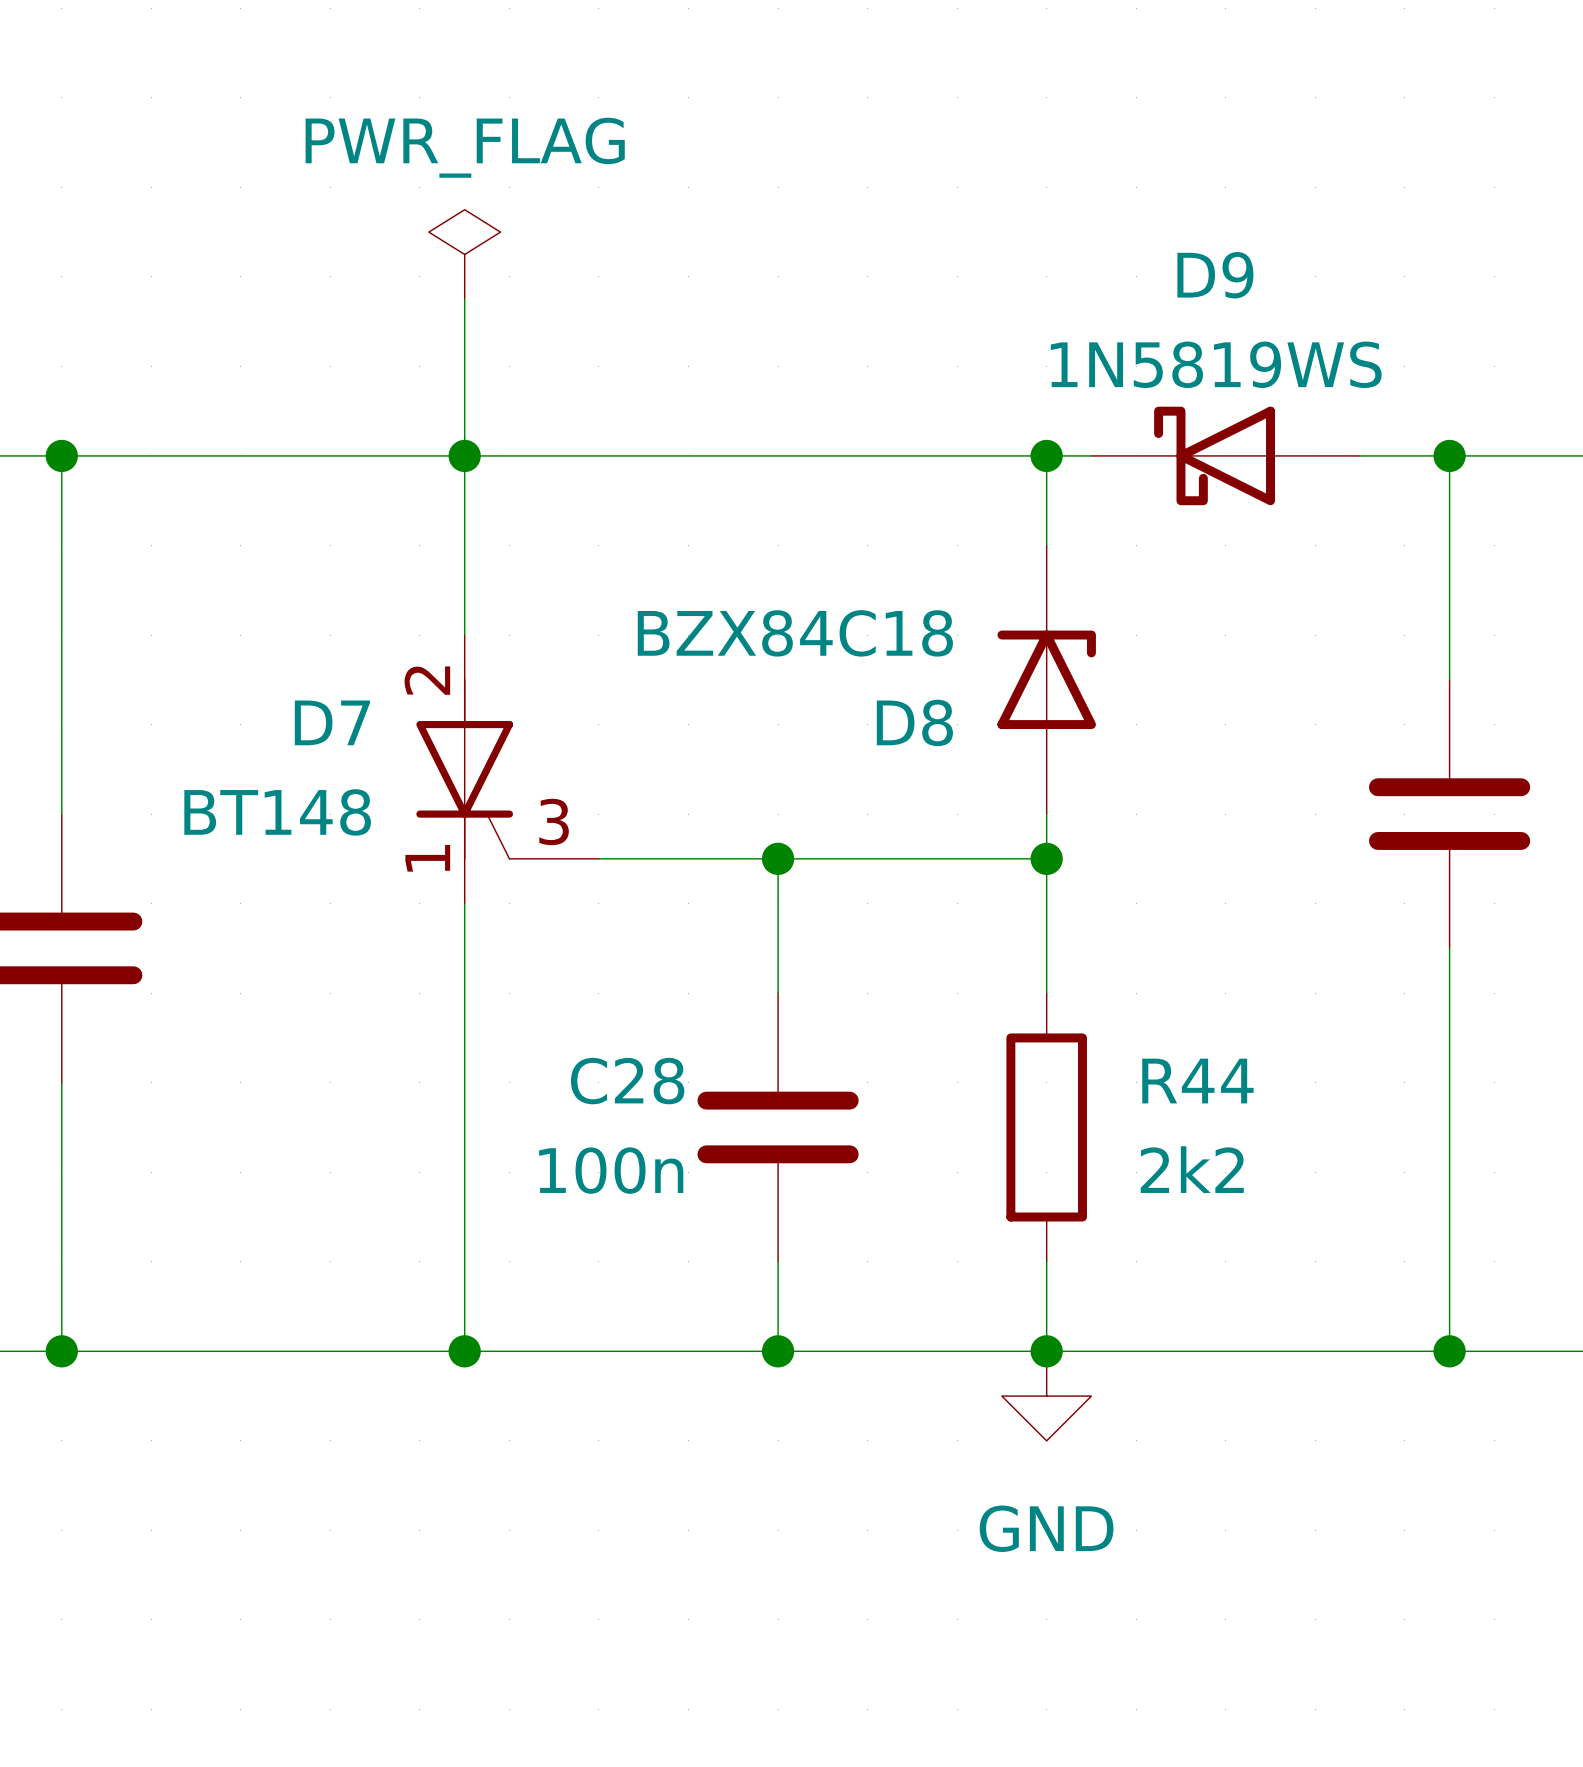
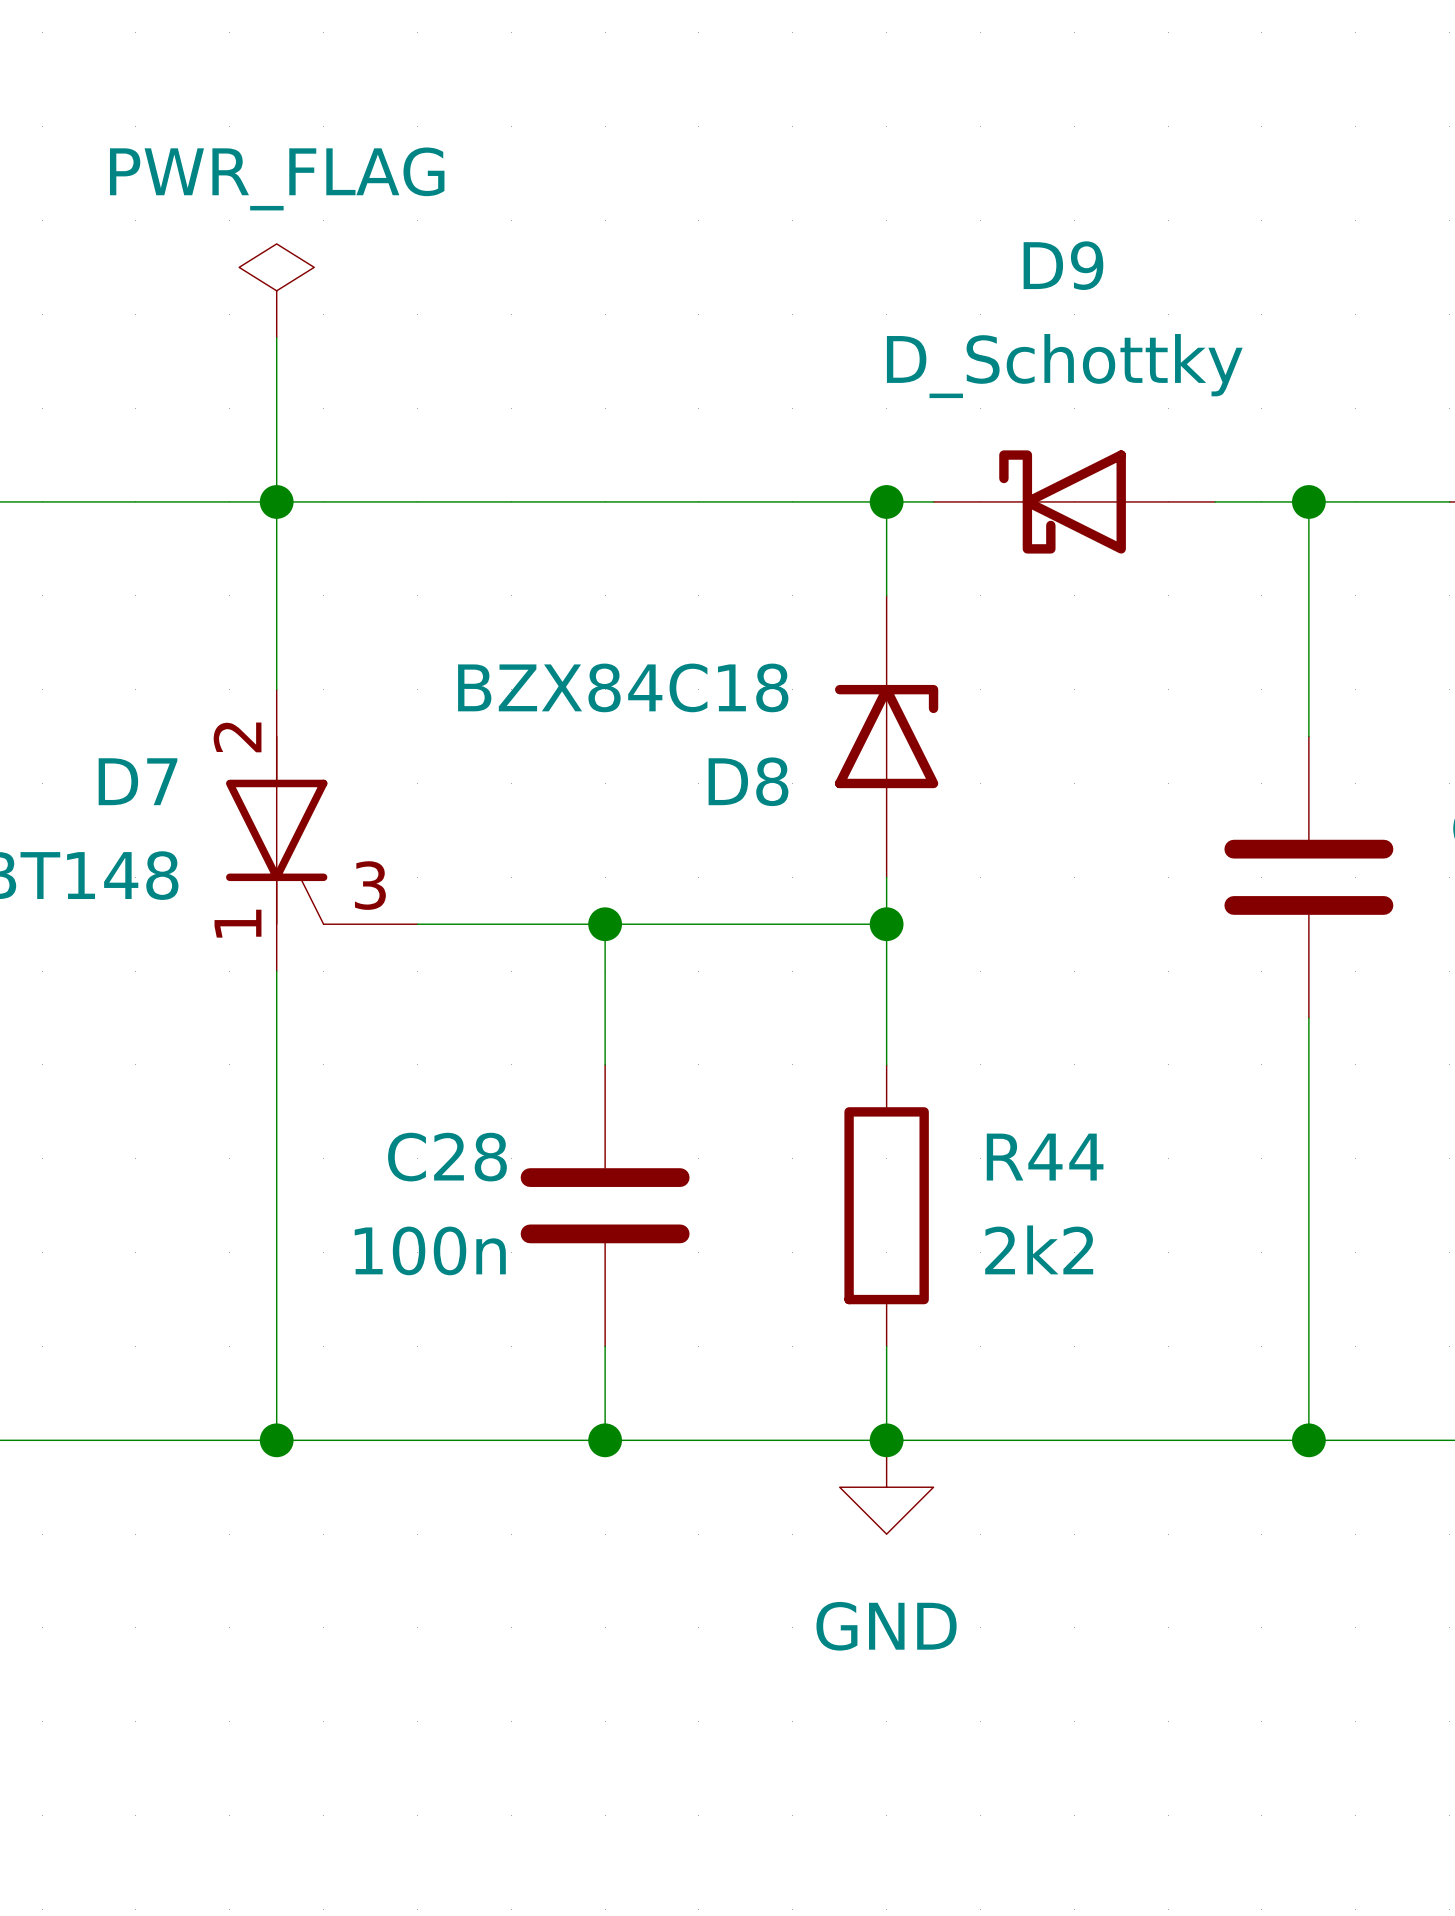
D9 name position: D9 (1215, 275) -> D9 (1063, 265)
D9 value: 1N5819WS (1216, 364) -> D_Schottky (1064, 366)

